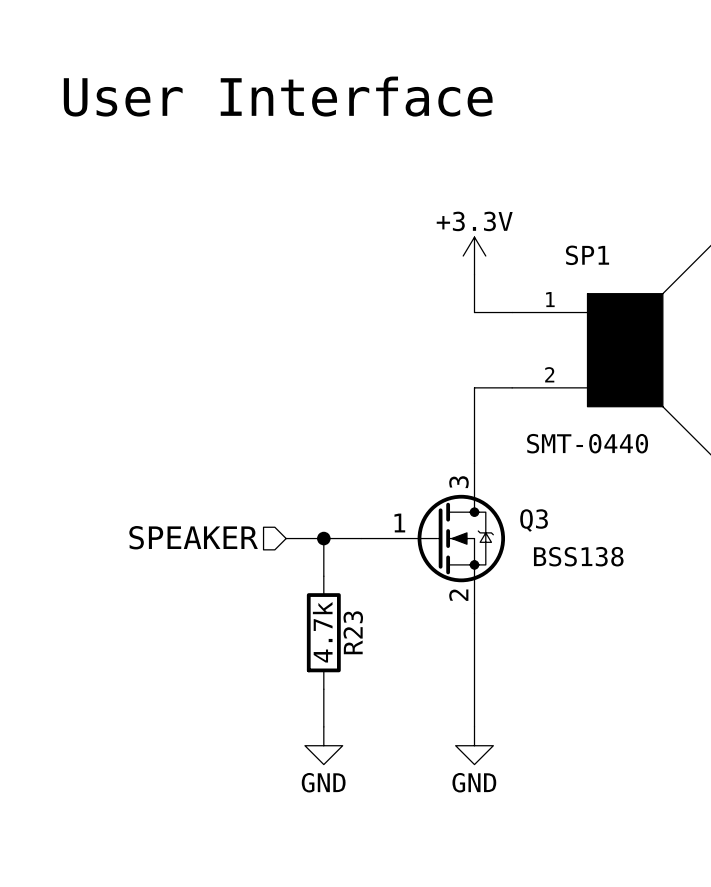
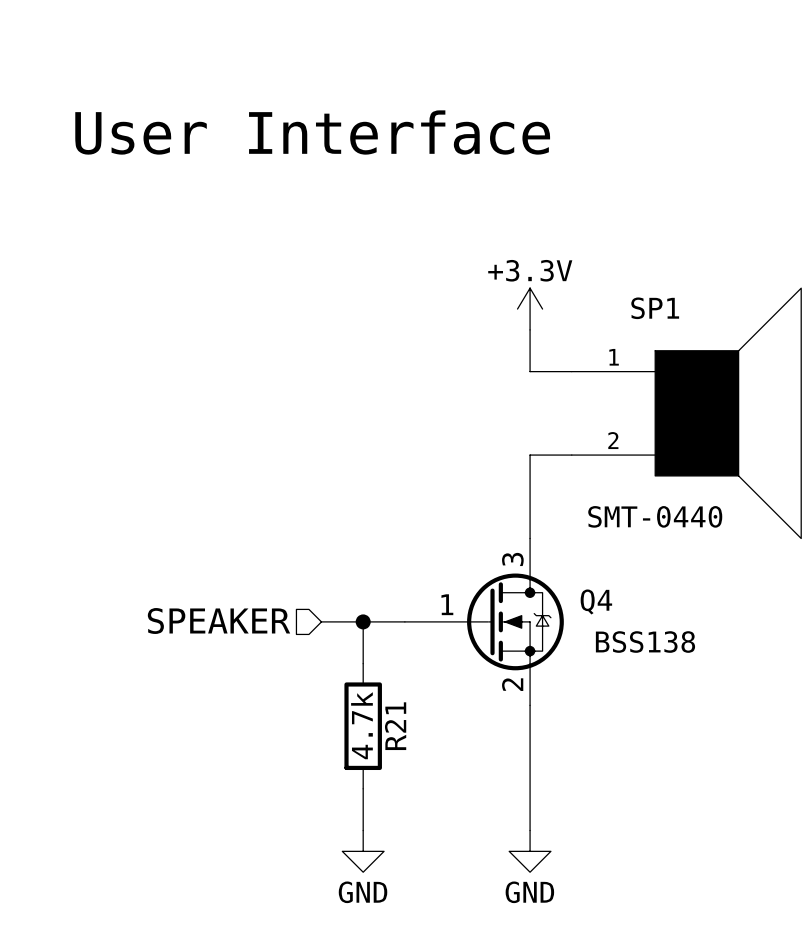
Q3 name: Q3 (534, 520) -> Q4 (596, 601)
R23 name: R23 (353, 632) -> R21 (395, 726)

